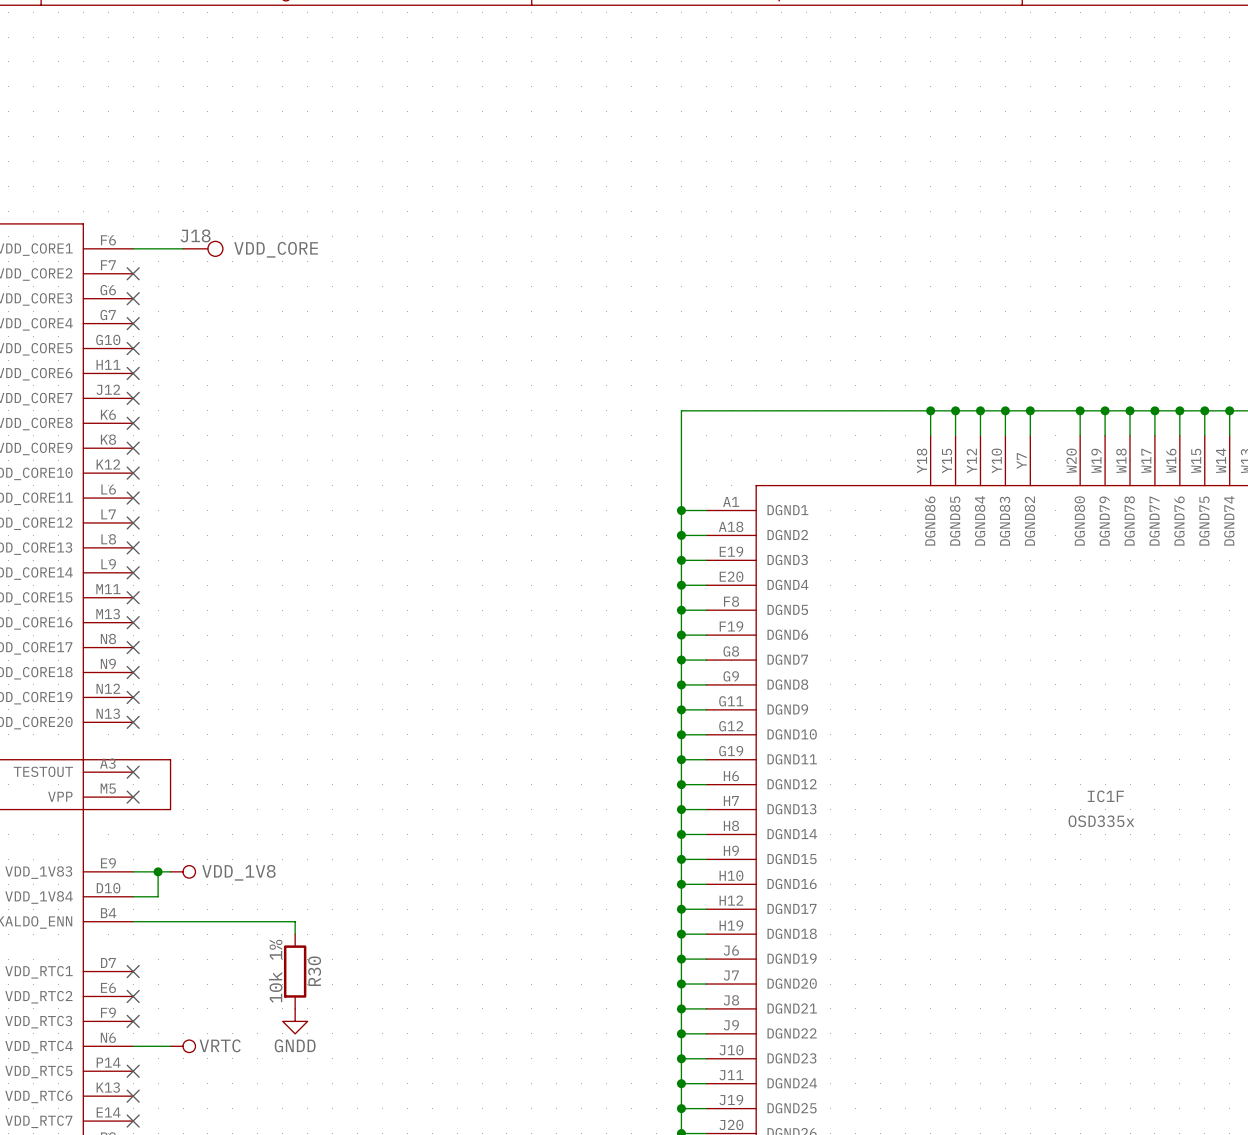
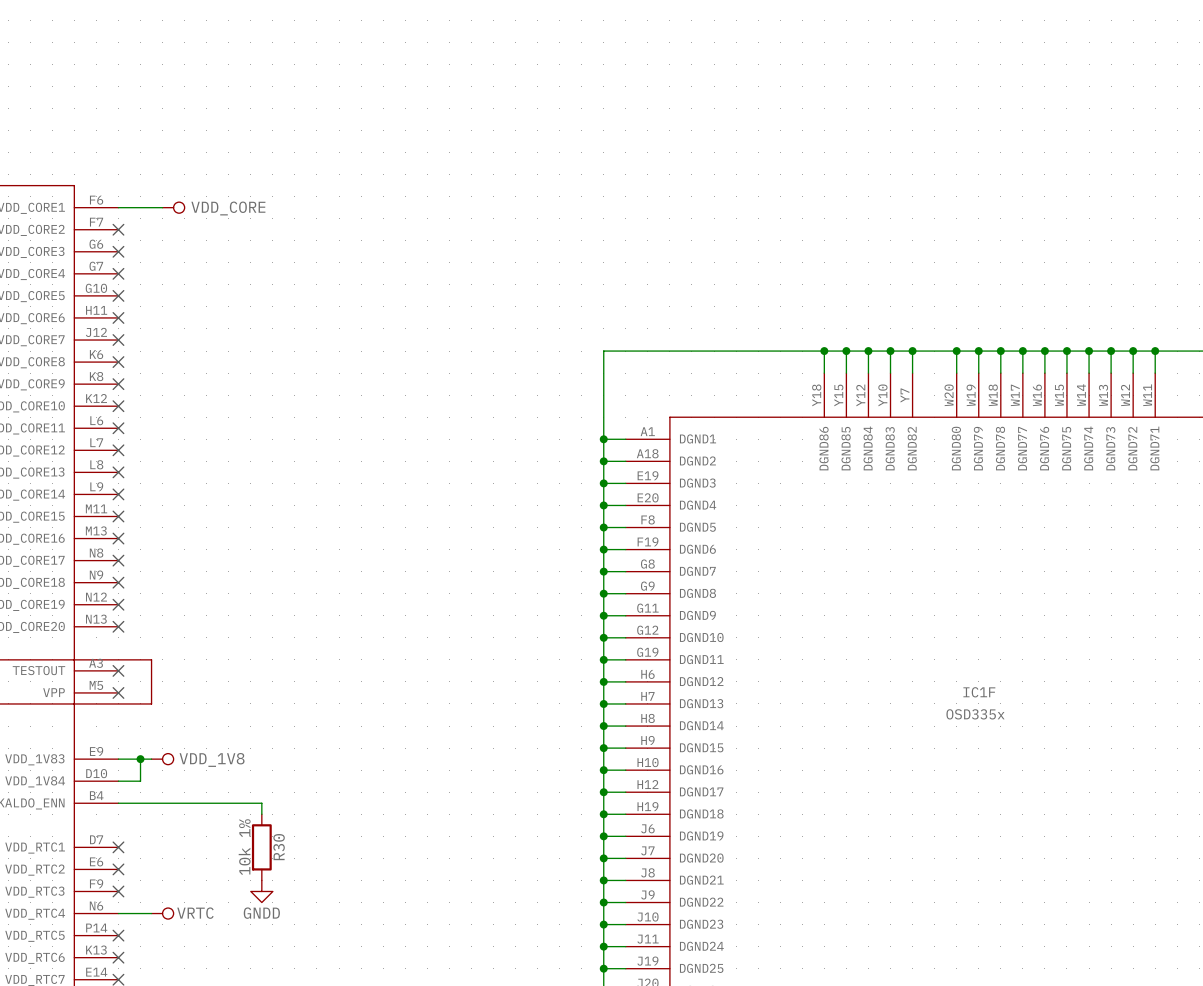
power symbol: none -> VDD_CORE (173, 207)
J18: VDD_CORE (202, 248) -> none

